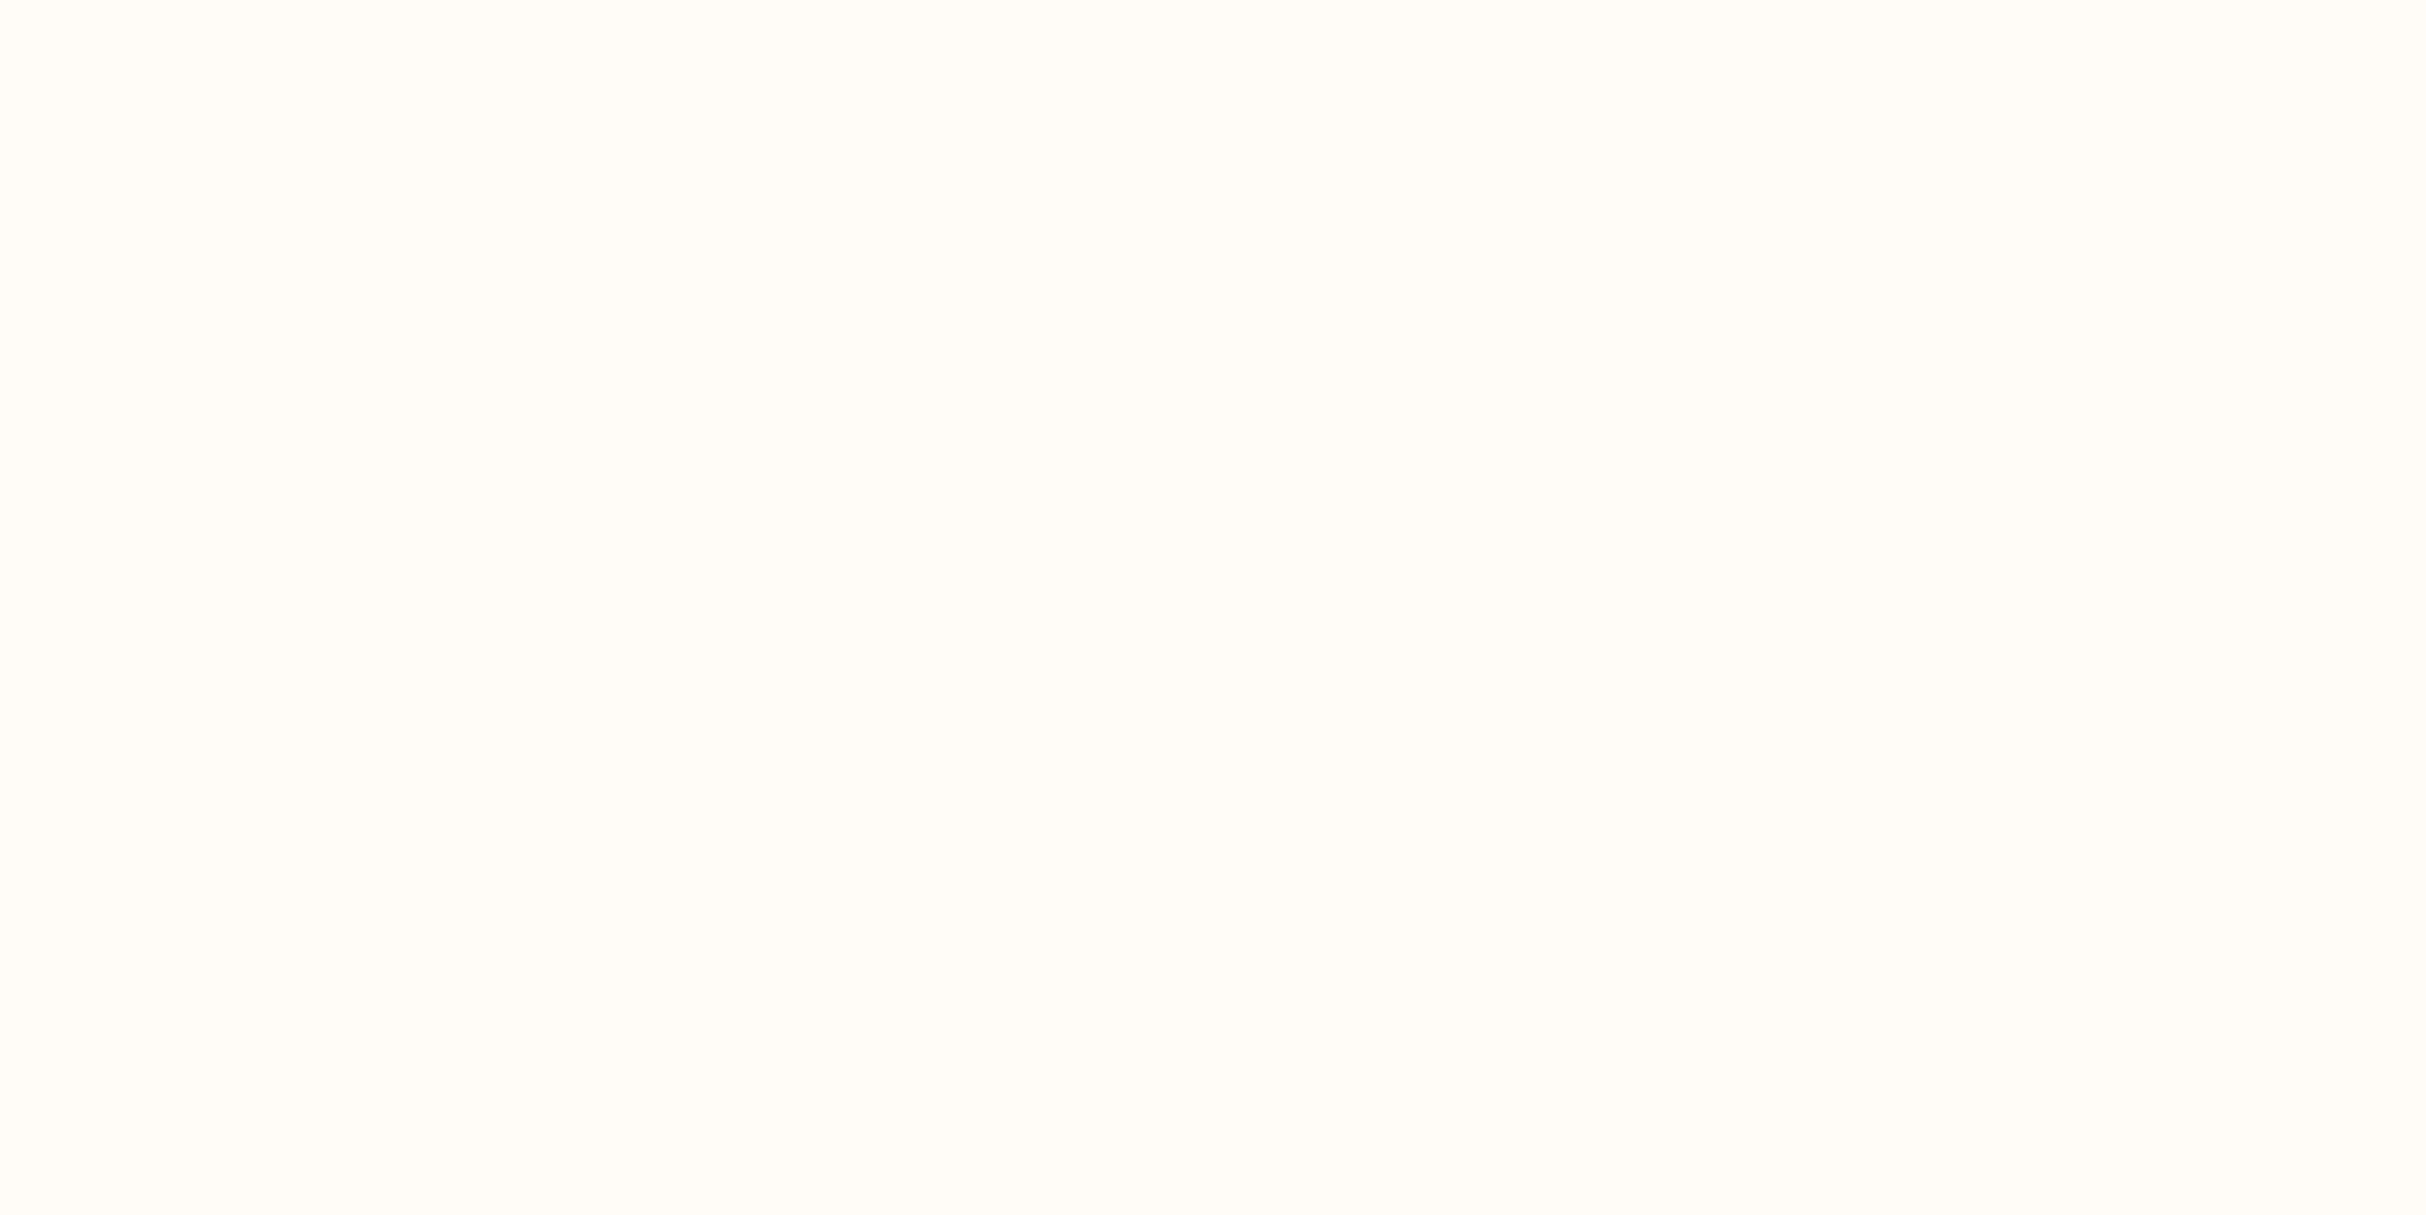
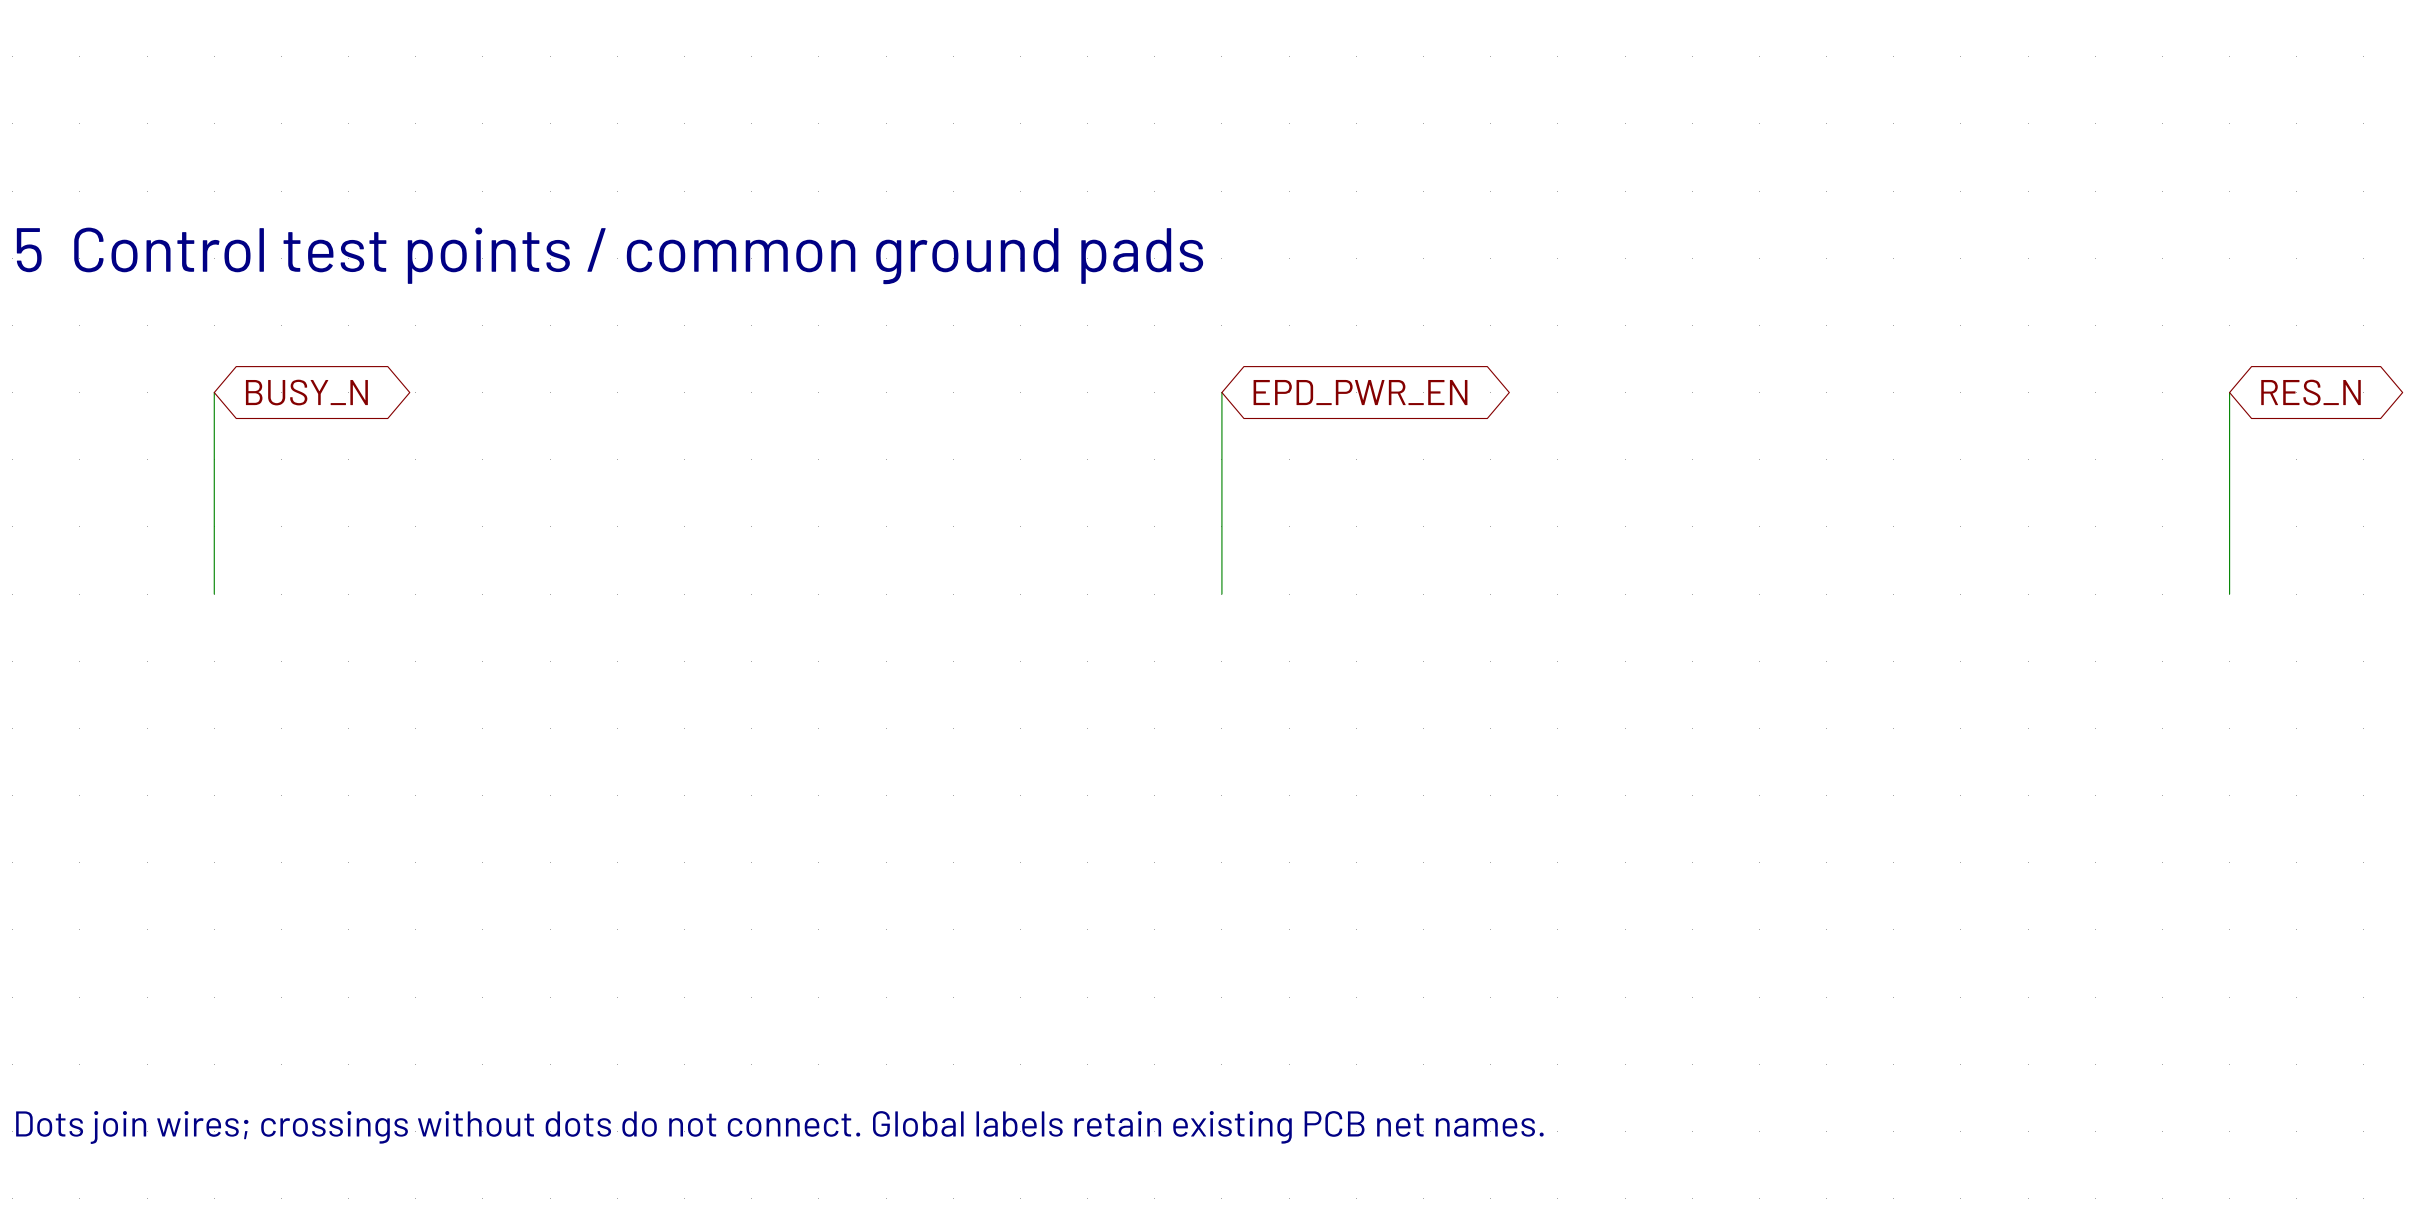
text: none -> 5 Control test points / common ground pads (610, 255)
wire: none -> (214, 392) (214, 594)
wire: none -> (1221, 392) (1221, 594)
wire: none -> (2229, 392) (2229, 594)
global label: none -> BUSY_N (306, 392)
global label: none -> EPD_PWR_EN (1360, 392)
global label: none -> RES_N (2311, 392)
text: none -> Dots join wires; crossings without dots do not connect. Global labels retain existing PCB net names. (779, 1127)

